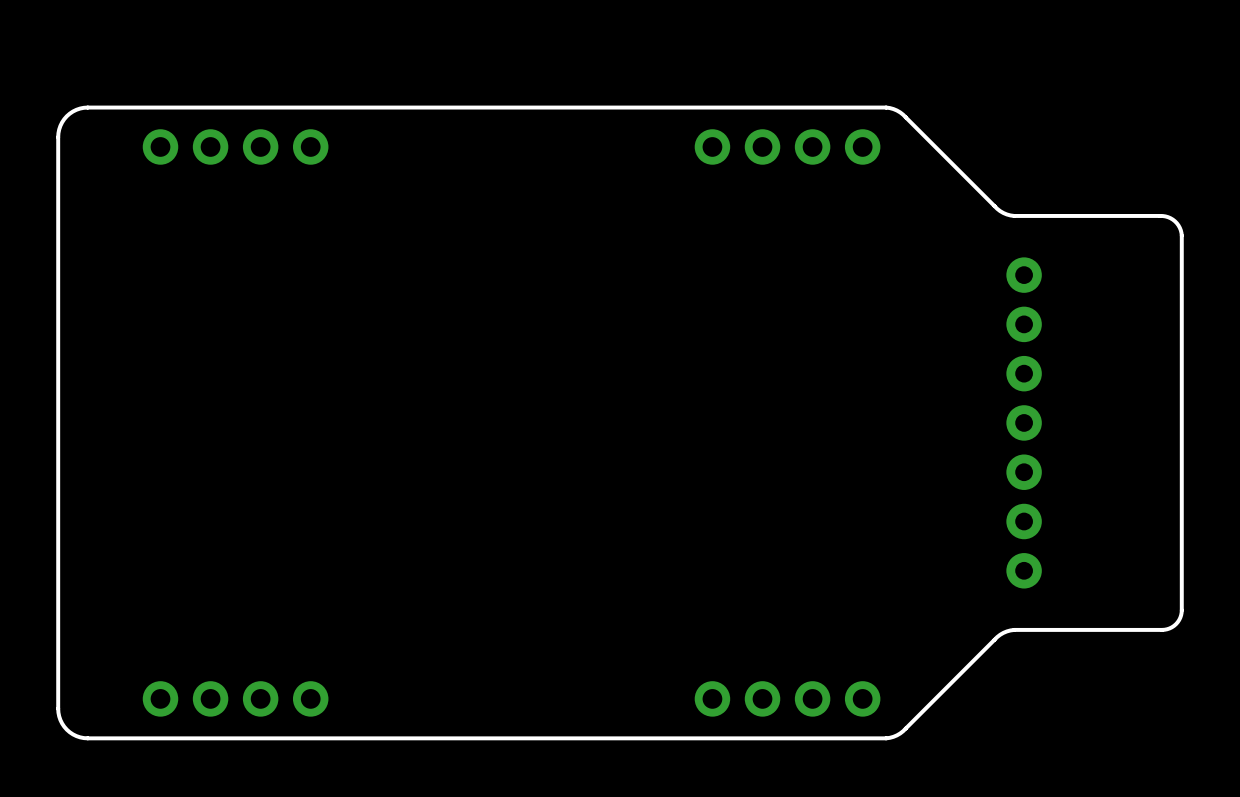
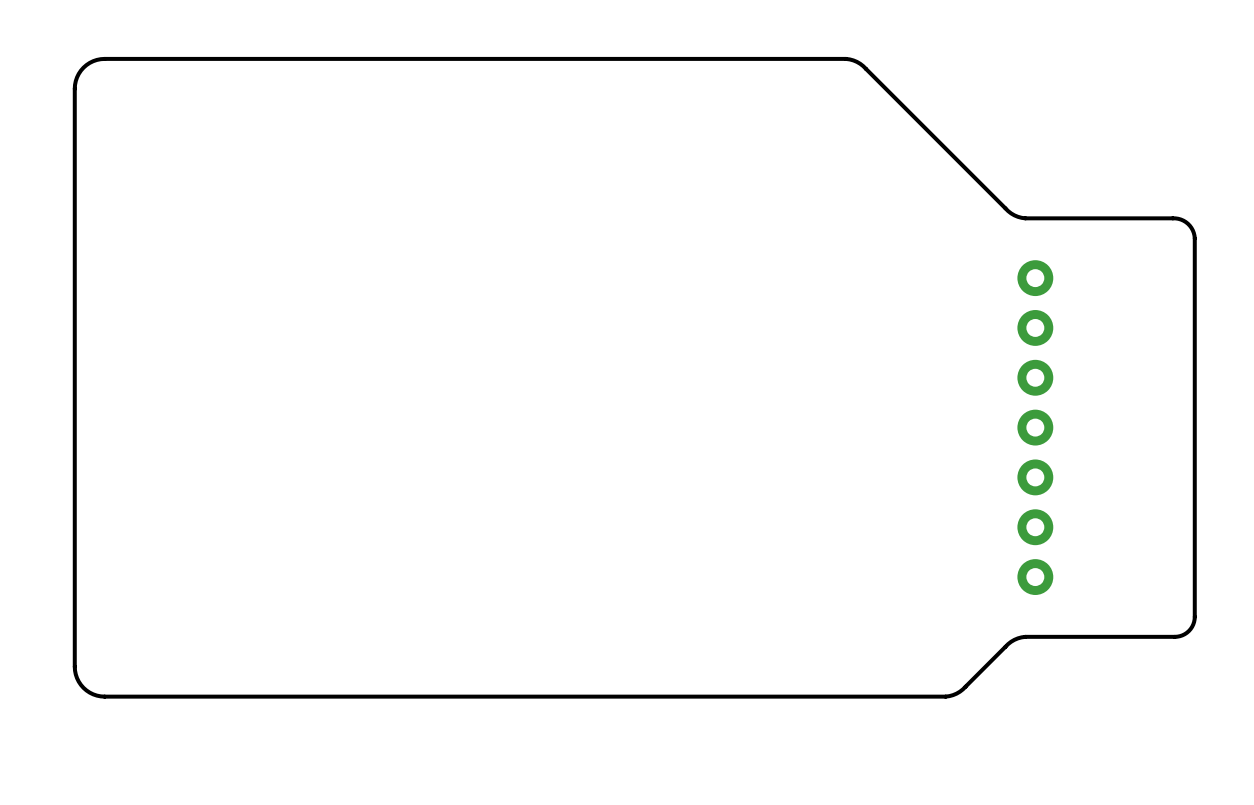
board edge: (905, 117) (896, 110) (886, 107) (87, 107) (80, 108) (69, 113) (62, 122) (58, 137) (58, 712) (60, 720) (66, 729) (76, 736) (87, 738) (886, 738) (903, 731) (955, 679) -> (915, 118) (863, 66) (846, 58) (104, 58) (89, 62) (78, 73) (74, 88) (75, 670) (77, 678) (83, 687) (93, 694) (104, 696) (945, 696) (956, 693) (965, 686)
part: (235, 146) -> none
part: (787, 146) -> none
part: (235, 698) -> none
part: (787, 698) -> none

